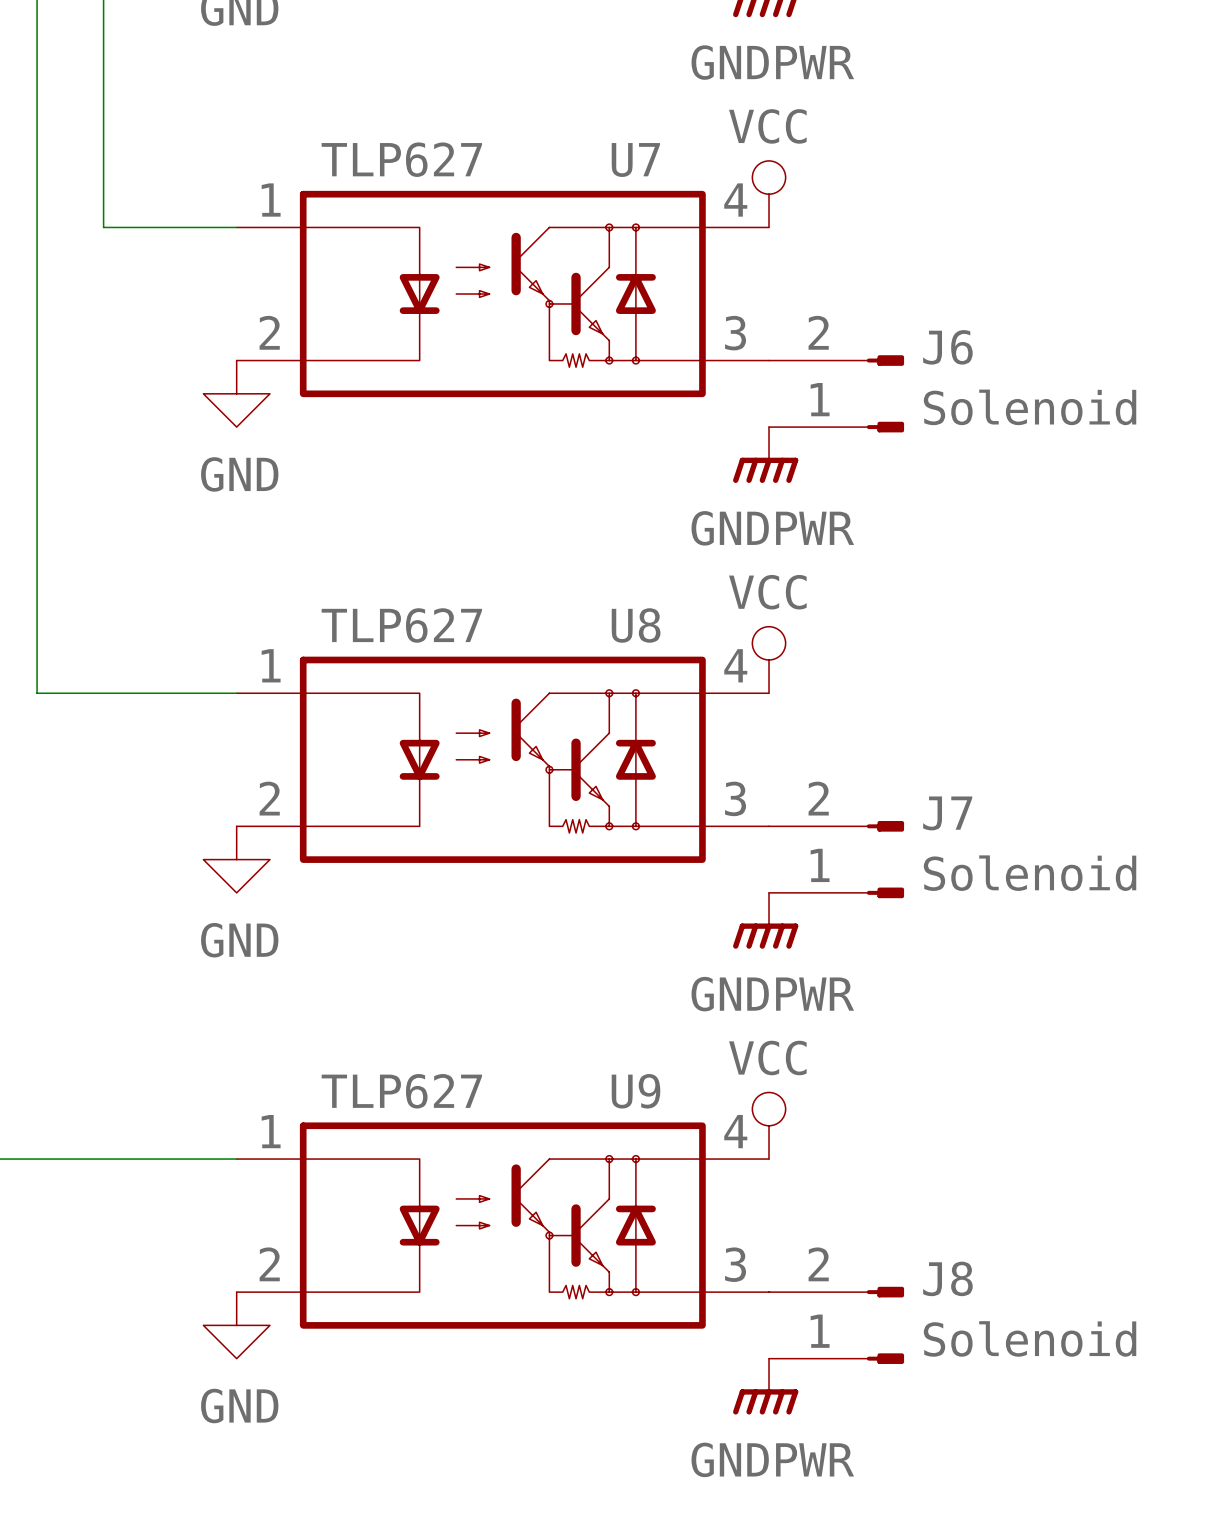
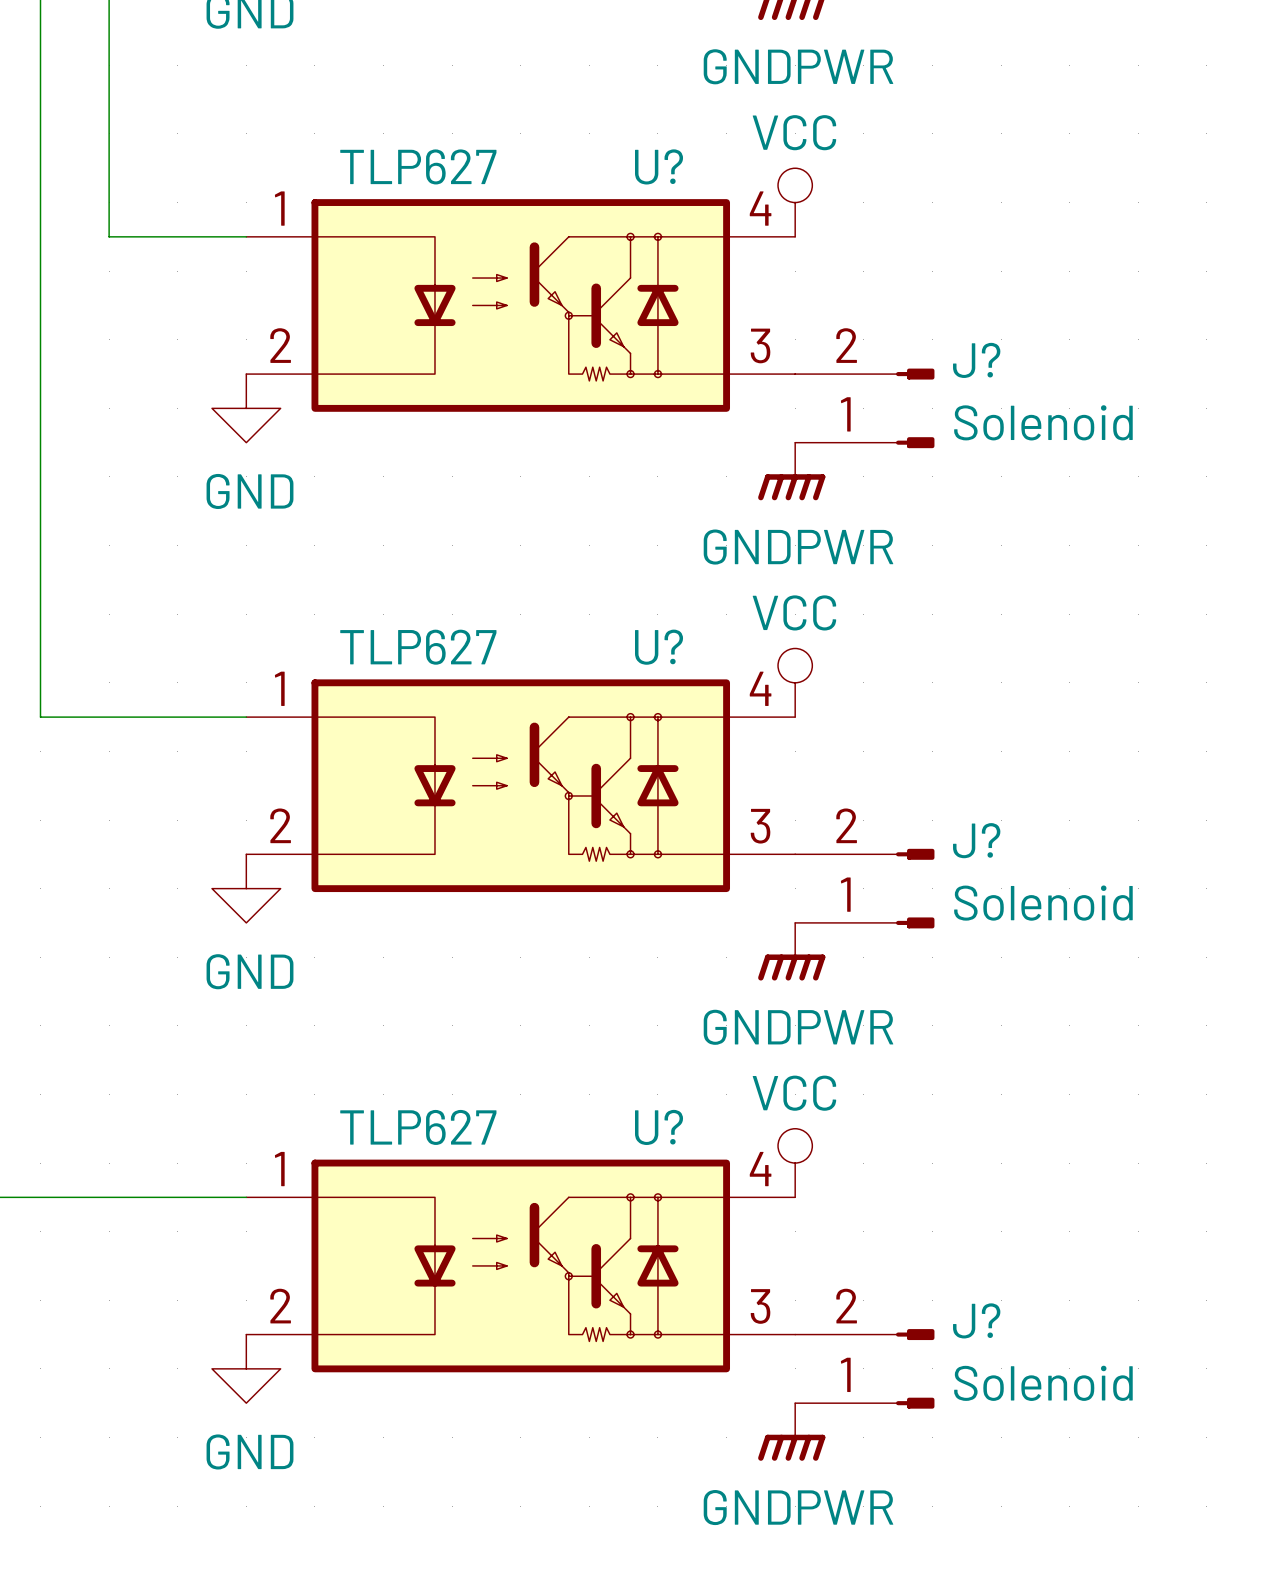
U7 name: U7 (635, 160) -> U? (659, 166)
J6 name: J6 (947, 347) -> J? (976, 360)
U8 name: U8 (636, 625) -> U? (659, 647)
J7 name: J7 (947, 813) -> J? (976, 840)
U9 name: U9 (636, 1091) -> U? (659, 1127)
J8 name: J8 (947, 1278) -> J? (976, 1320)

